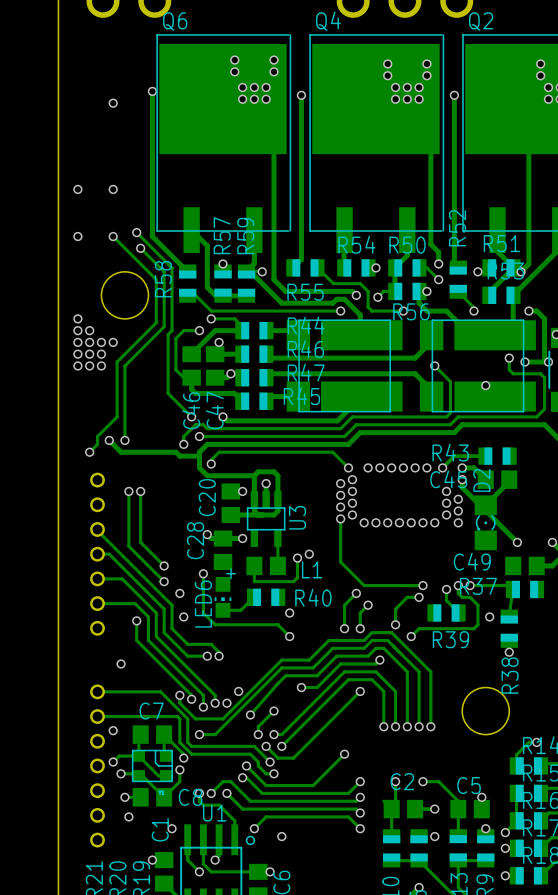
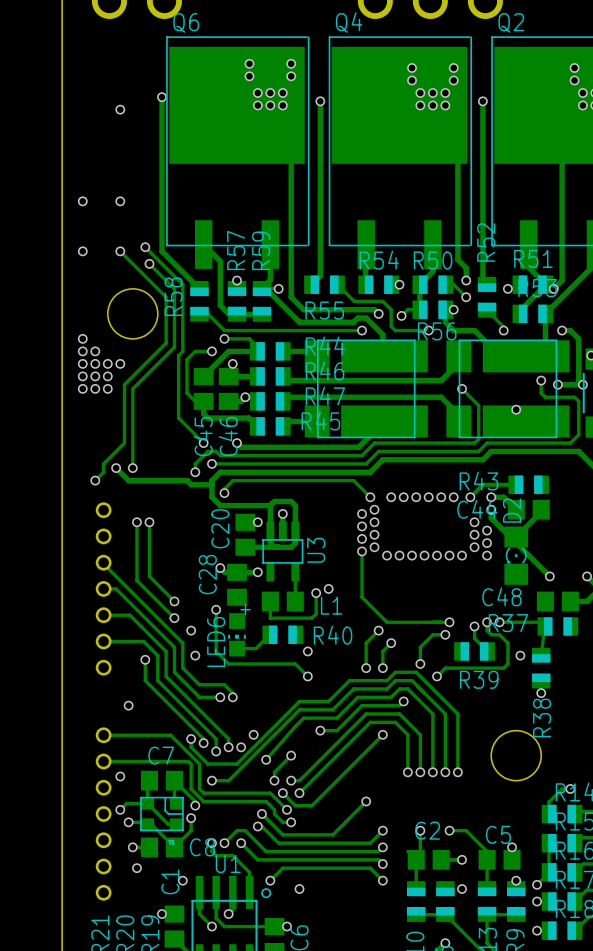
C46 name: C46 (191, 410) -> C45 (203, 436)
C47 name: C47 (214, 410) -> C46 (228, 436)
C45 name: C45 (448, 479) -> C44 (477, 509)
C49 name: C49 (472, 561) -> C48 (501, 596)

